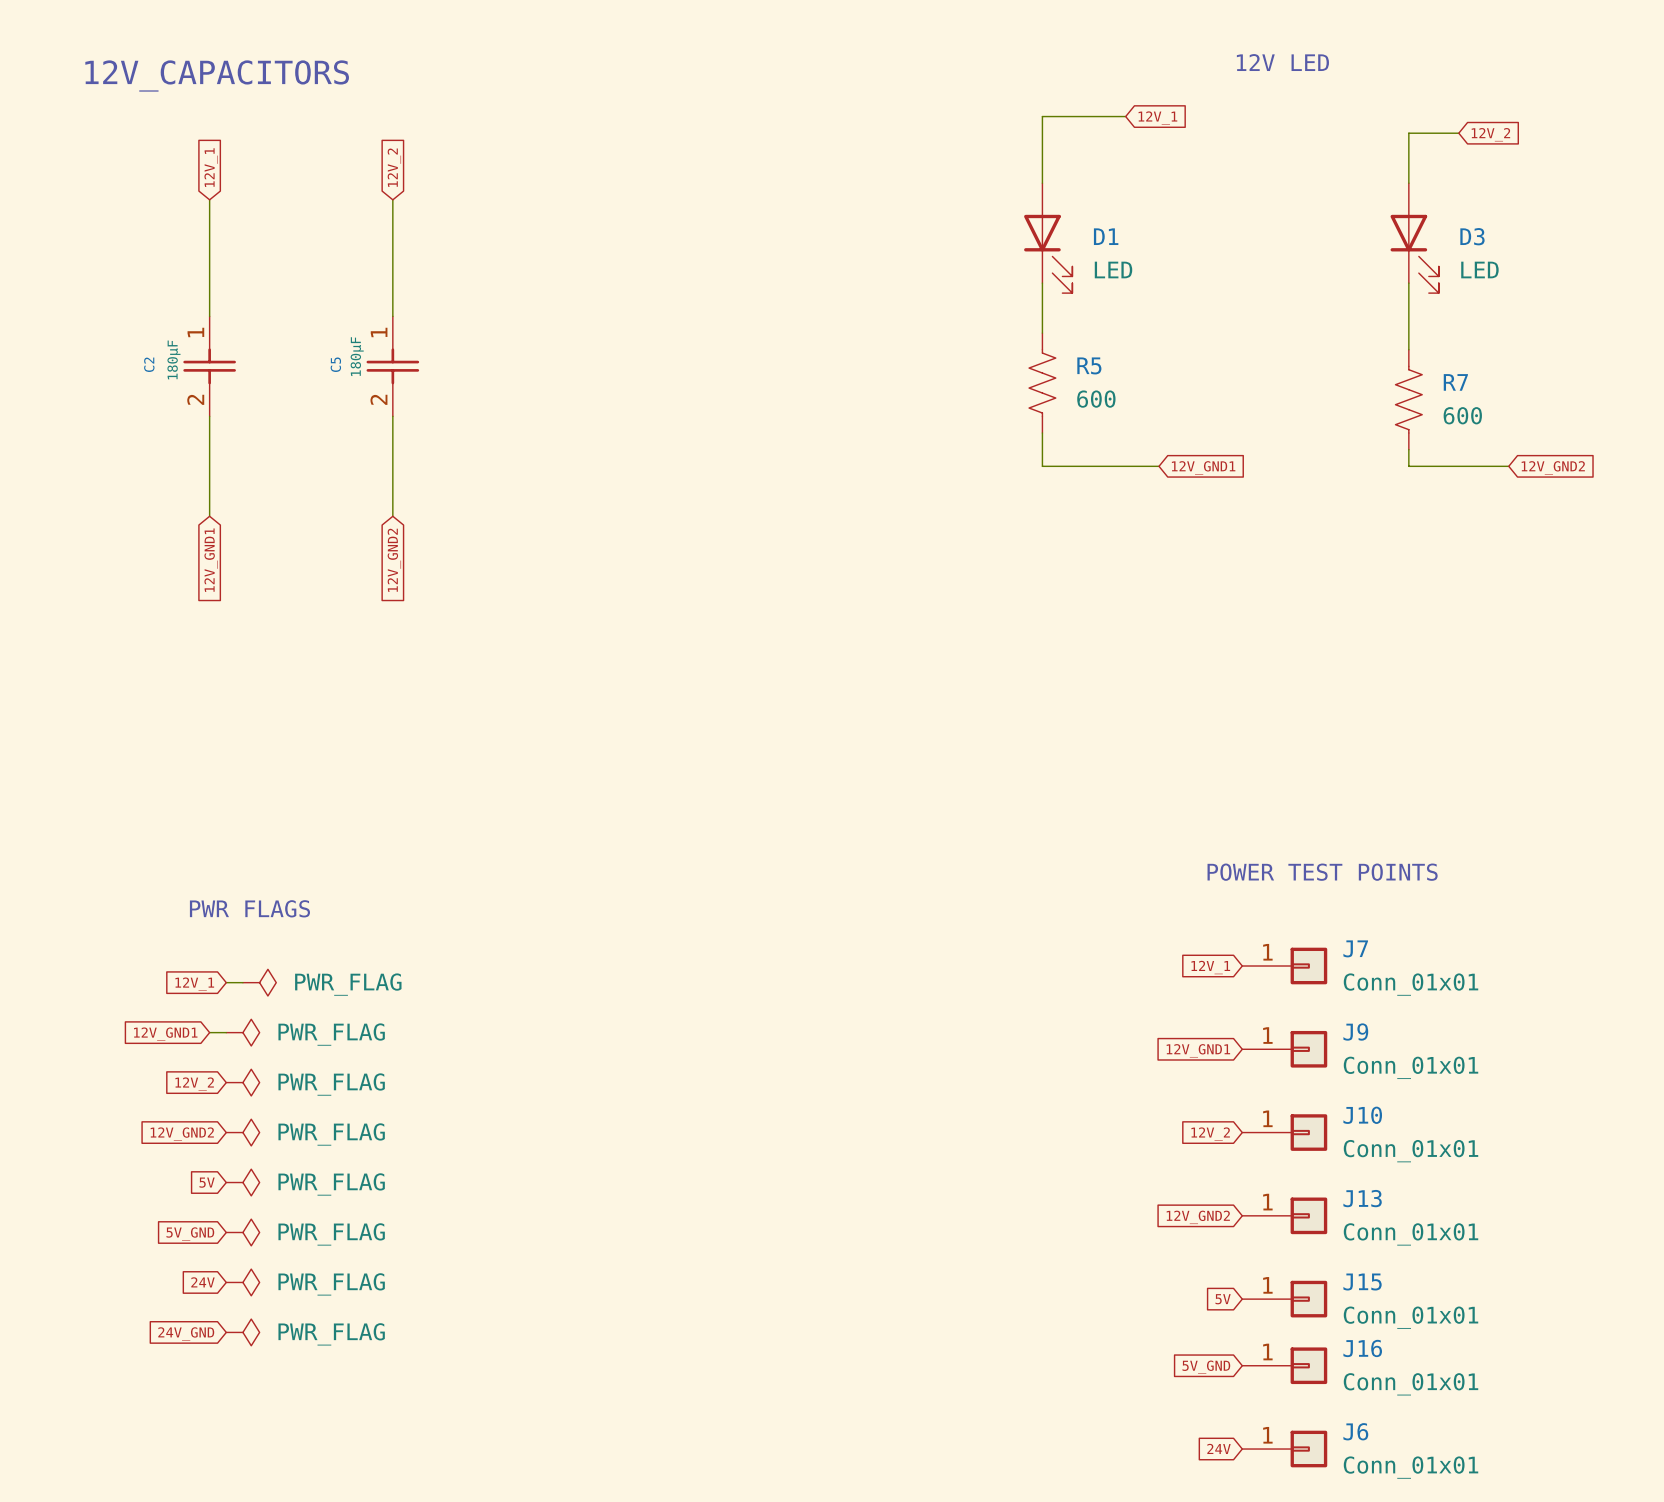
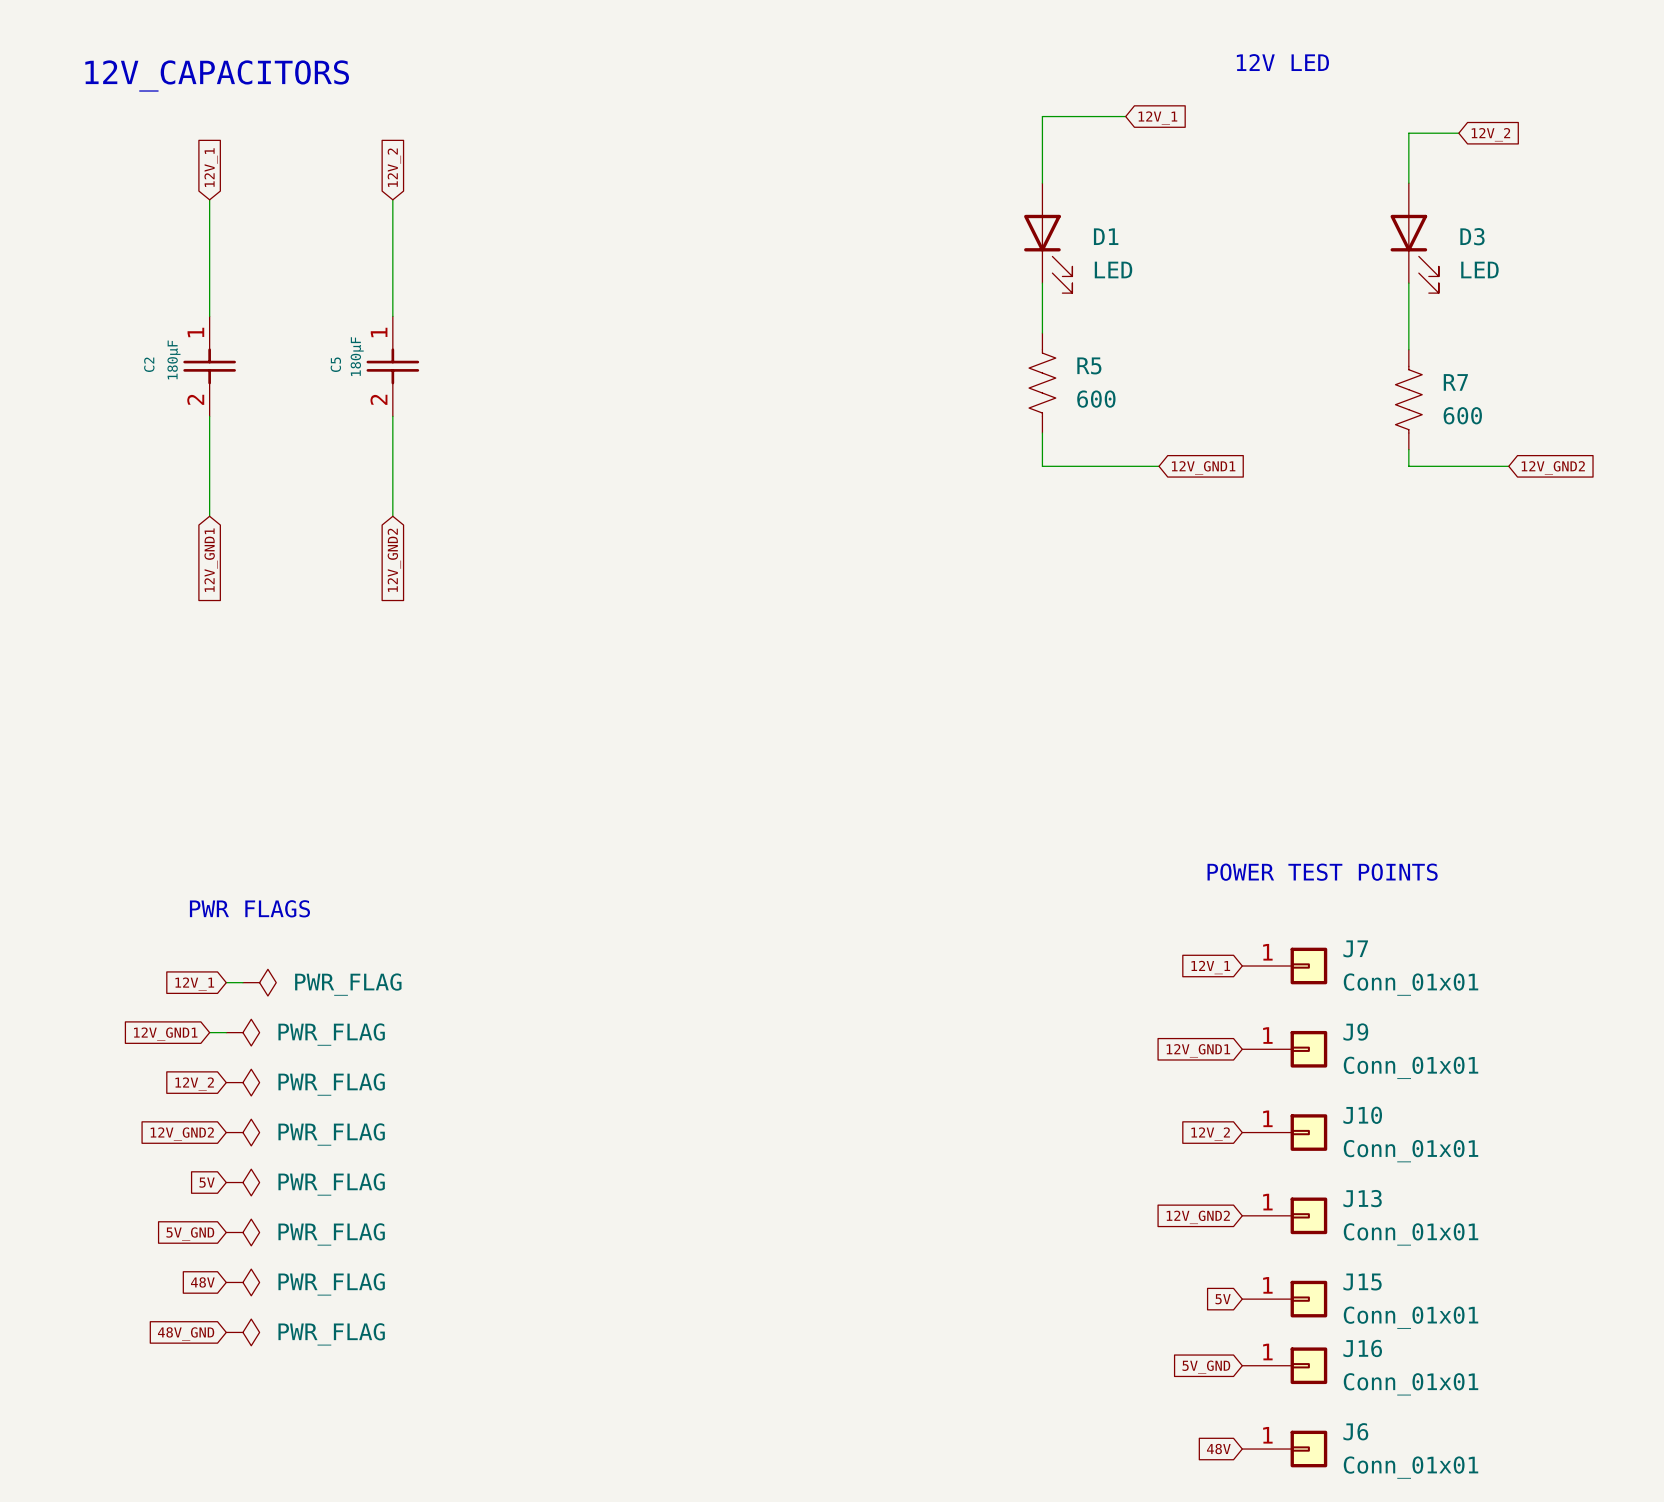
global label: 24V (202, 1282) -> 48V (202, 1282)
global label: 24V_GND (186, 1333) -> 48V_GND (186, 1333)
global label: 24V (1218, 1448) -> 48V (1218, 1449)

